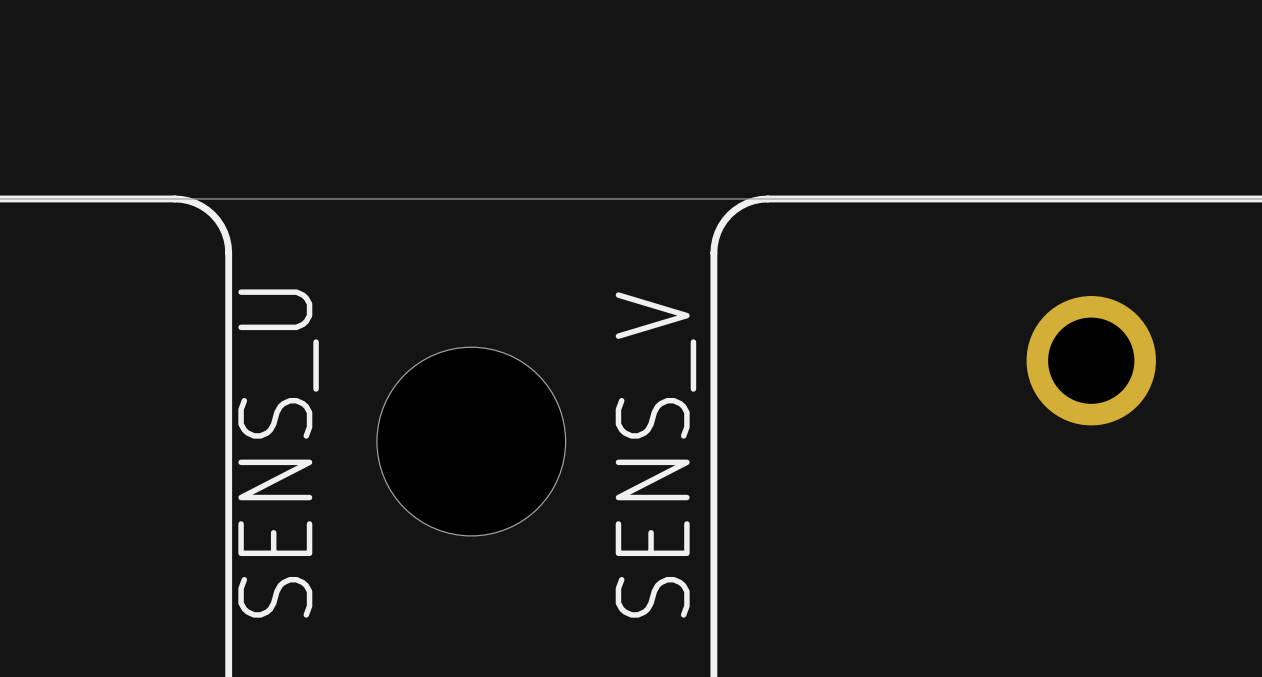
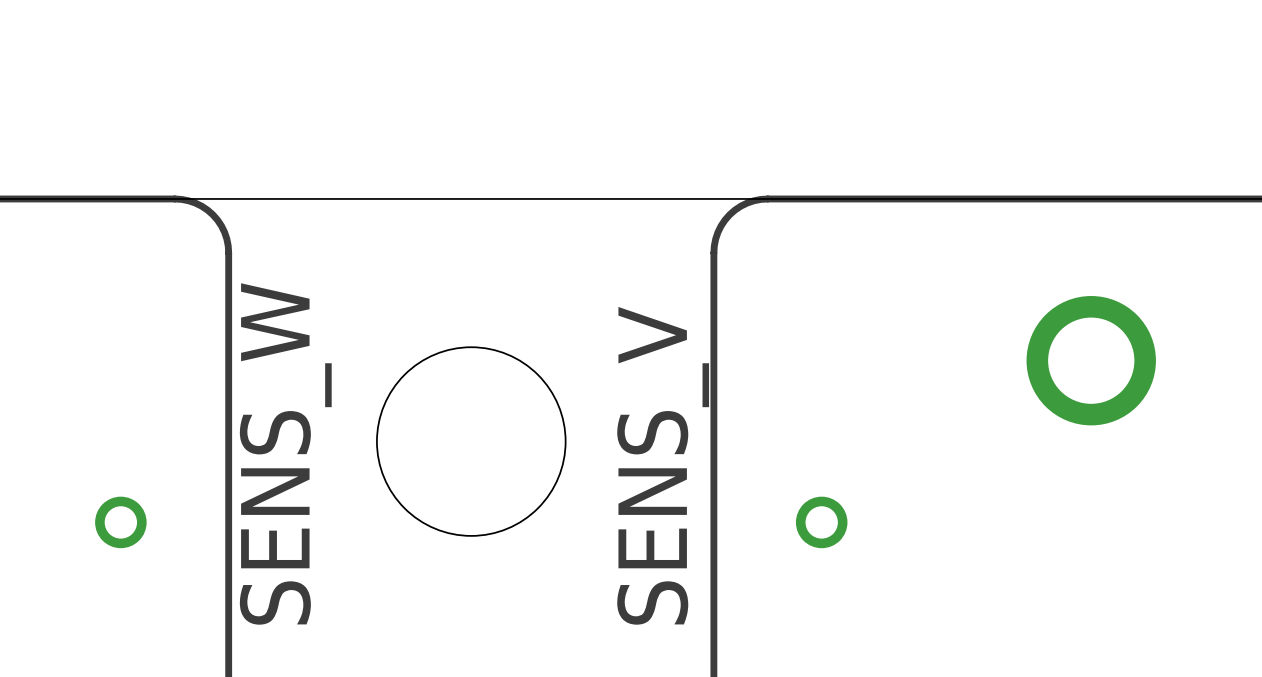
SENS_U name: SENS_U (278, 453) -> SENS_W (285, 453)
via: none -> (120, 522)
via: none -> (821, 522)

